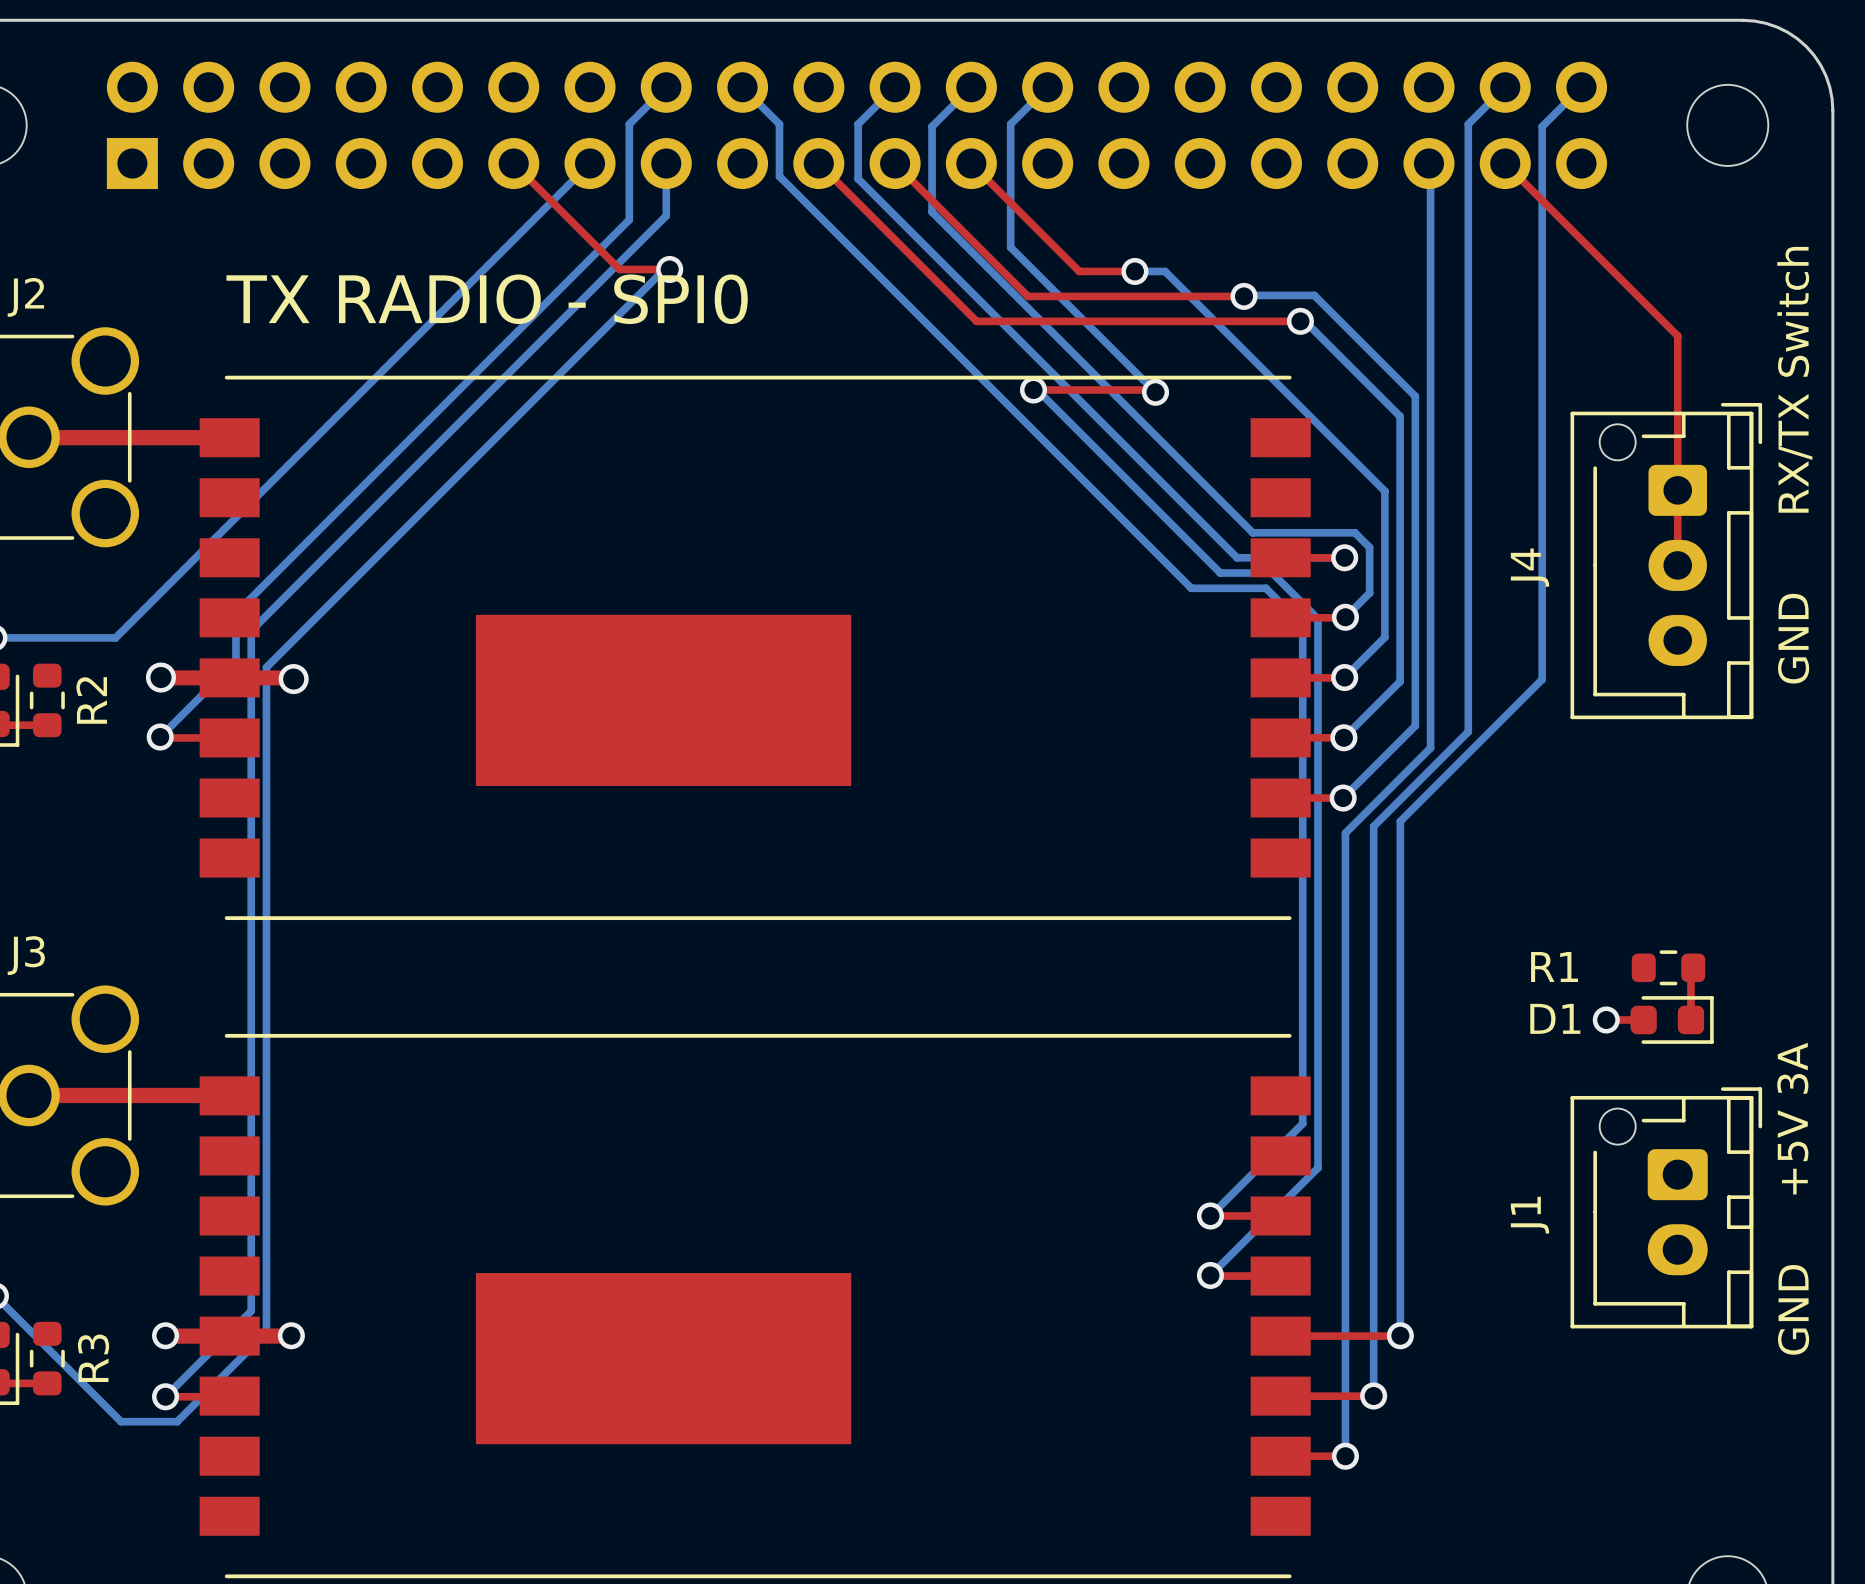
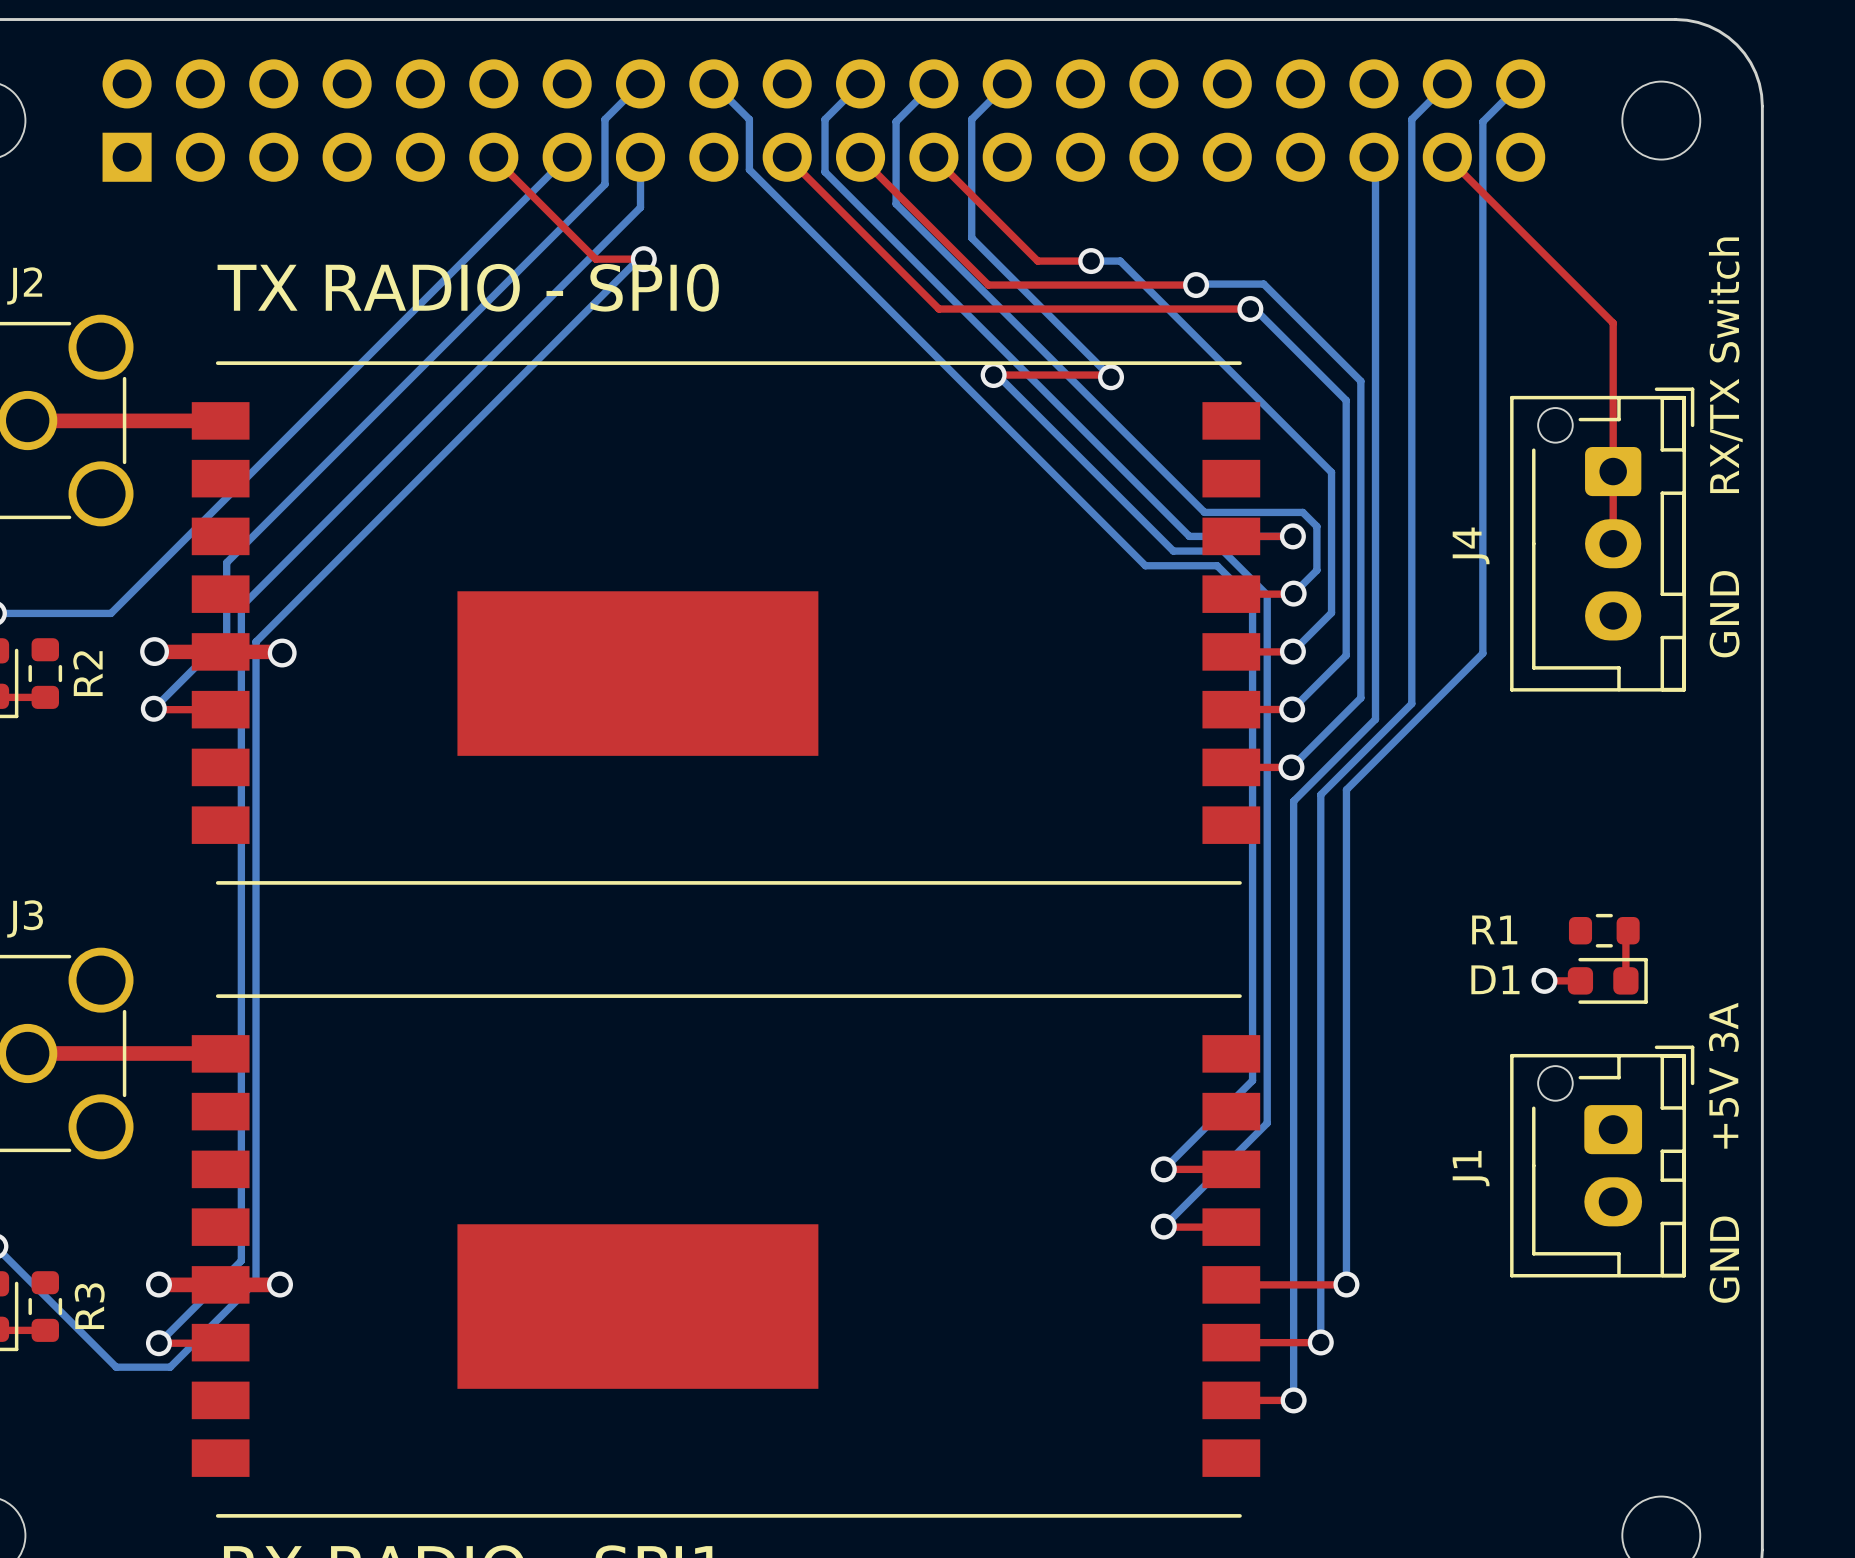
bottom track: (629, 191) (629, 219) (235, 613) -> (604, 184) (226, 562) (226, 589)

